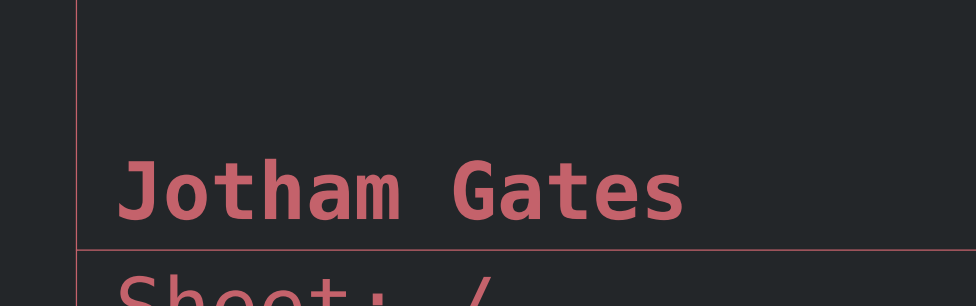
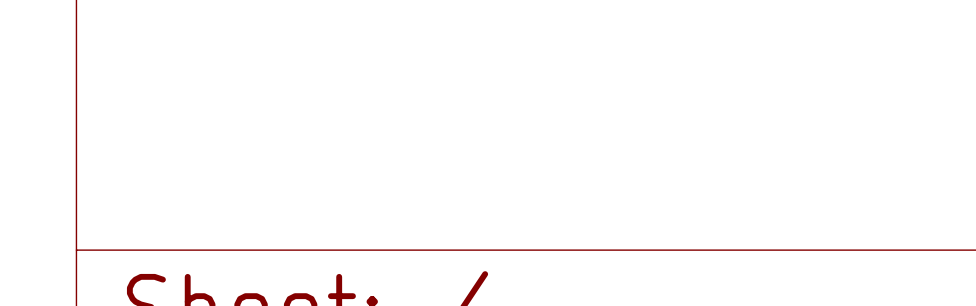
title block: Jotham Gates (400, 189) -> none

